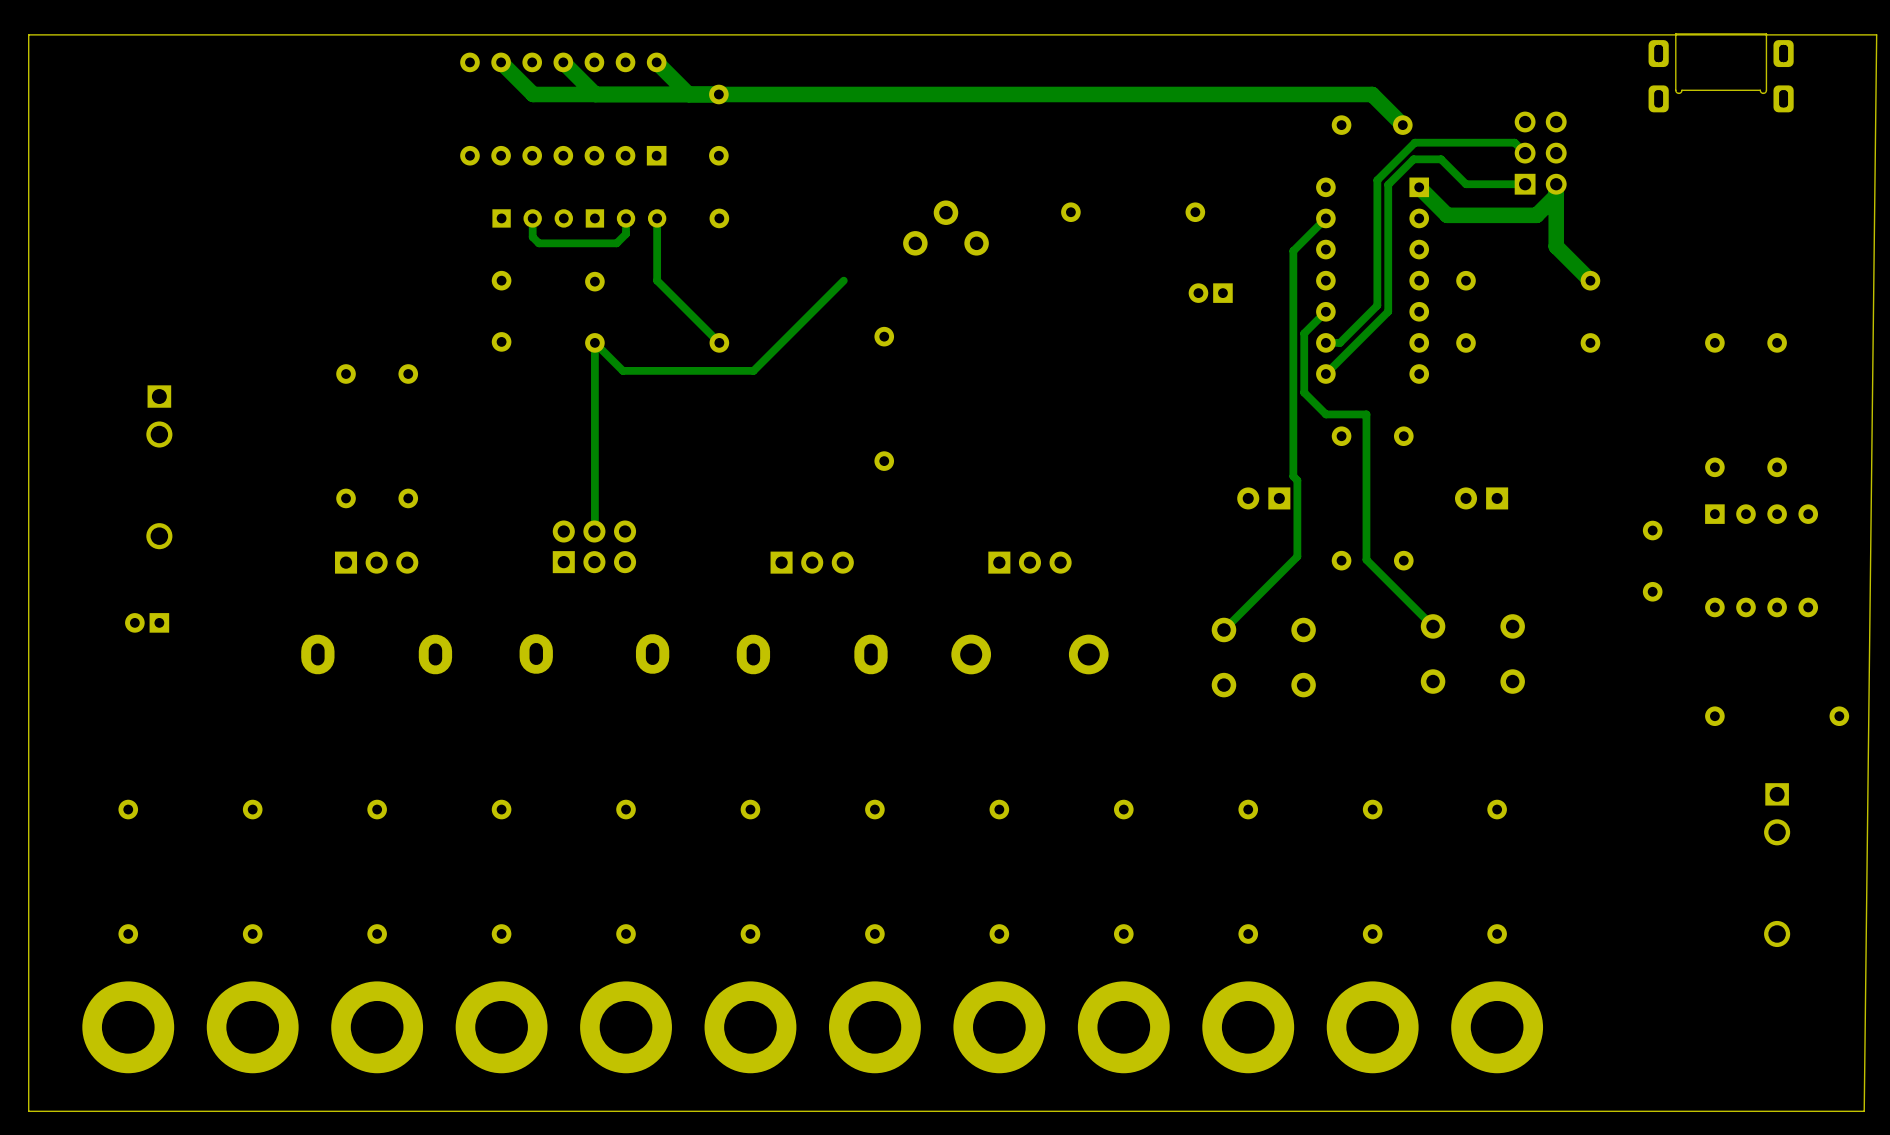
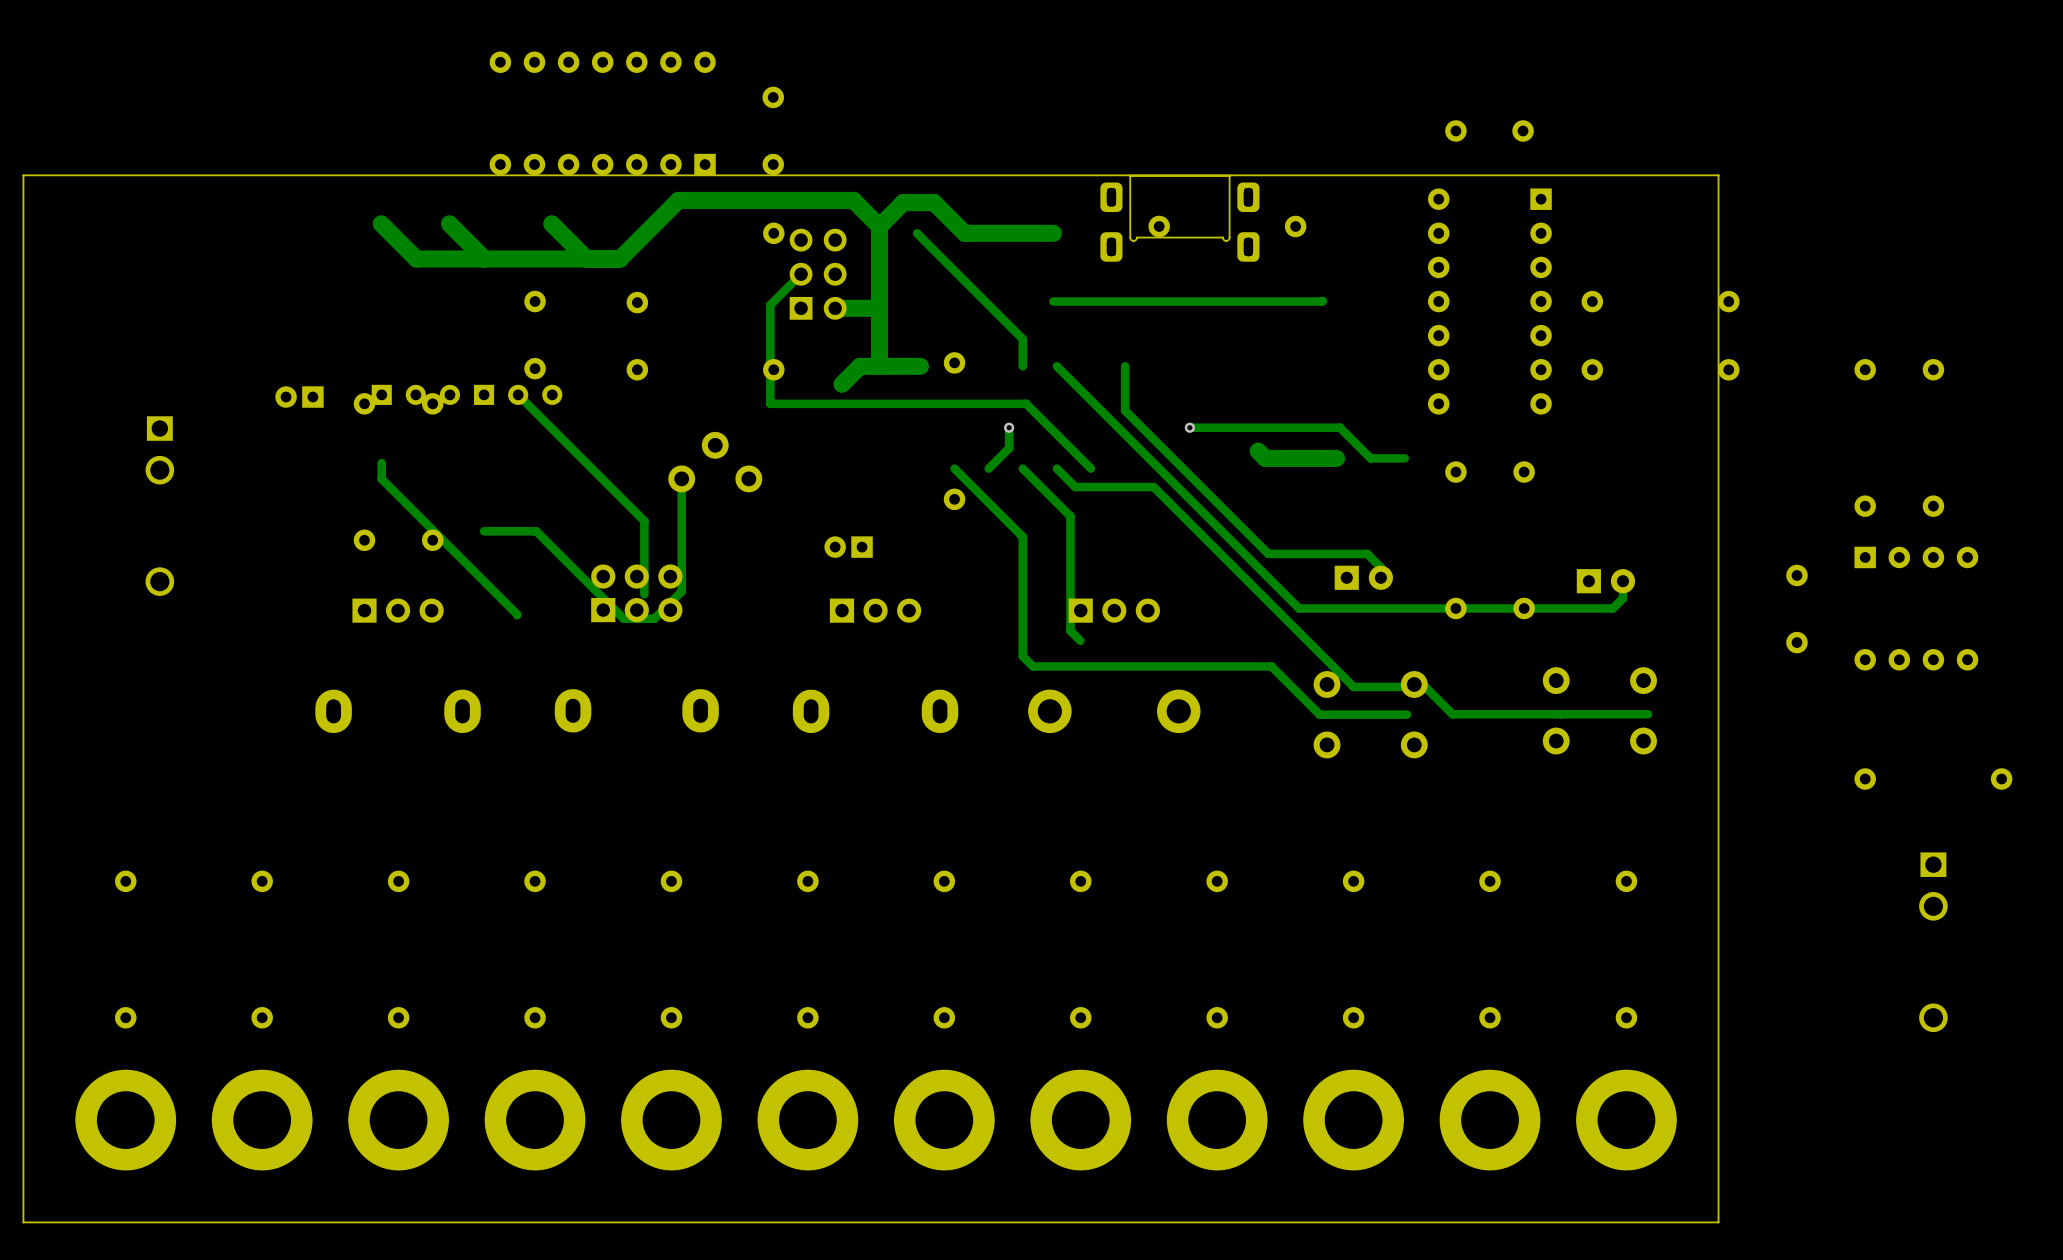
board edge: (1876, 34) (28, 34) (28, 1111) (1864, 1111) (1876, 34) -> (1718, 175) (1718, 1222) (23, 1222) (23, 175) (1718, 175)
track: (501, 62) (533, 94) (1372, 94) (1402, 125) -> none
track: (563, 62) (595, 94) -> (449, 223) (484, 258)
track: (656, 62) (688, 94) -> (551, 223) (586, 258)
part: (1721, 73) -> none
track: (1525, 153) (1514, 142) (1414, 142) (1377, 180) (1377, 305) (1340, 342) (1325, 342) -> none
part: (1540, 153) -> none
track: (1525, 184) (1466, 184) (1441, 159) (1413, 159) (1388, 184) (1388, 311) (1325, 373) -> none
track: (1556, 184) (1556, 246) (1590, 280) -> none
track: (1419, 187) (1447, 215) (1536, 215) (1556, 195) -> none
part: none -> (1179, 218)
track: none -> (381, 223) (416, 258) (619, 258) (678, 200) (853, 200) (879, 226)
track: none -> (879, 226) (879, 366)
track: none -> (879, 226) (903, 202) (934, 202) (964, 233) (1053, 233)
part: (532, 218) -> none
track: (626, 218) (626, 234) (616, 243) (538, 243) (532, 237) (532, 218) -> none
part: (626, 218) -> none
track: (657, 218) (657, 280) (719, 342) -> none
track: none -> (917, 233) (1022, 339) (1022, 366)
track: (1325, 218) (1293, 250) (1293, 476) (1297, 480) (1297, 556) (1223, 629) -> none
part: (945, 228) -> none
track: none -> (801, 274) (770, 304) (770, 403) (1026, 403) (1090, 468)
part: none -> (818, 274)
track: (843, 280) (753, 370) (622, 370) (594, 342) (594, 531) -> none
track: none -> (1322, 300) (1053, 301)
track: none -> (879, 308) (835, 308)
part: (1210, 293) -> none
track: (1325, 311) (1304, 333) (1304, 392) (1326, 414) (1366, 414) (1366, 559) (1433, 626) -> none
track: none -> (920, 366) (859, 366) (841, 384)
track: none -> (1056, 366) (1299, 608) (1612, 608) (1622, 598) (1622, 581)
track: none -> (1125, 366) (1125, 410) (1268, 553) (1367, 553) (1380, 567) (1380, 577)
part: none -> (415, 394)
track: none -> (518, 394) (644, 521) (644, 594)
part: none -> (518, 394)
track: none -> (1009, 427) (1009, 448) (988, 468)
via: none -> (1009, 427)
track: none -> (1189, 427) (1339, 427) (1370, 458) (1404, 458)
via: none -> (1189, 427)
track: none -> (1258, 451) (1265, 458) (1336, 458)
part: none -> (715, 462)
track: none -> (381, 463) (381, 479) (517, 615)
track: none -> (954, 468) (1022, 536) (1022, 656) (1032, 666) (1271, 666) (1319, 714) (1406, 714)
track: none -> (1022, 468) (1070, 516) (1070, 630) (1080, 640)
track: none -> (1056, 468) (1075, 487) (1153, 487) (1353, 686) (1425, 686) (1452, 714) (1648, 714)
track: none -> (681, 478) (681, 591) (654, 618) (623, 618) (536, 531) (484, 531)
part rotation: 0° (1263, 498) -> 180° (1363, 577)
part position: (1263, 498) -> (1363, 577)
part rotation: 0° (1481, 498) -> 180° (1605, 581)
part position: (1481, 498) -> (1605, 581)
part: none -> (848, 547)
part position: (147, 622) -> (299, 397)

